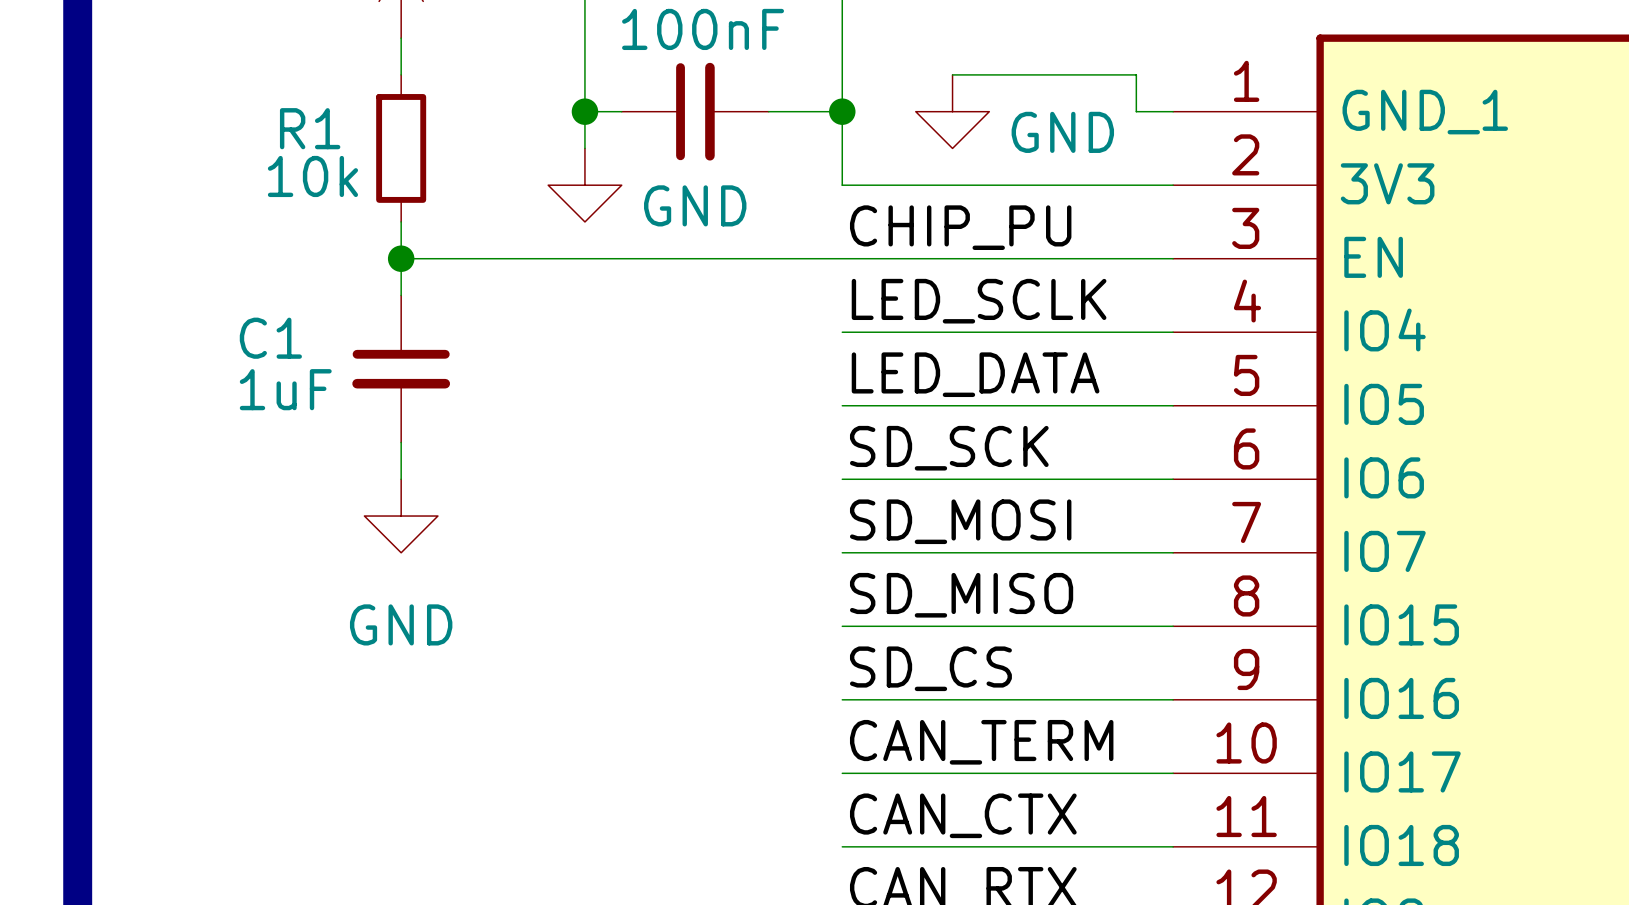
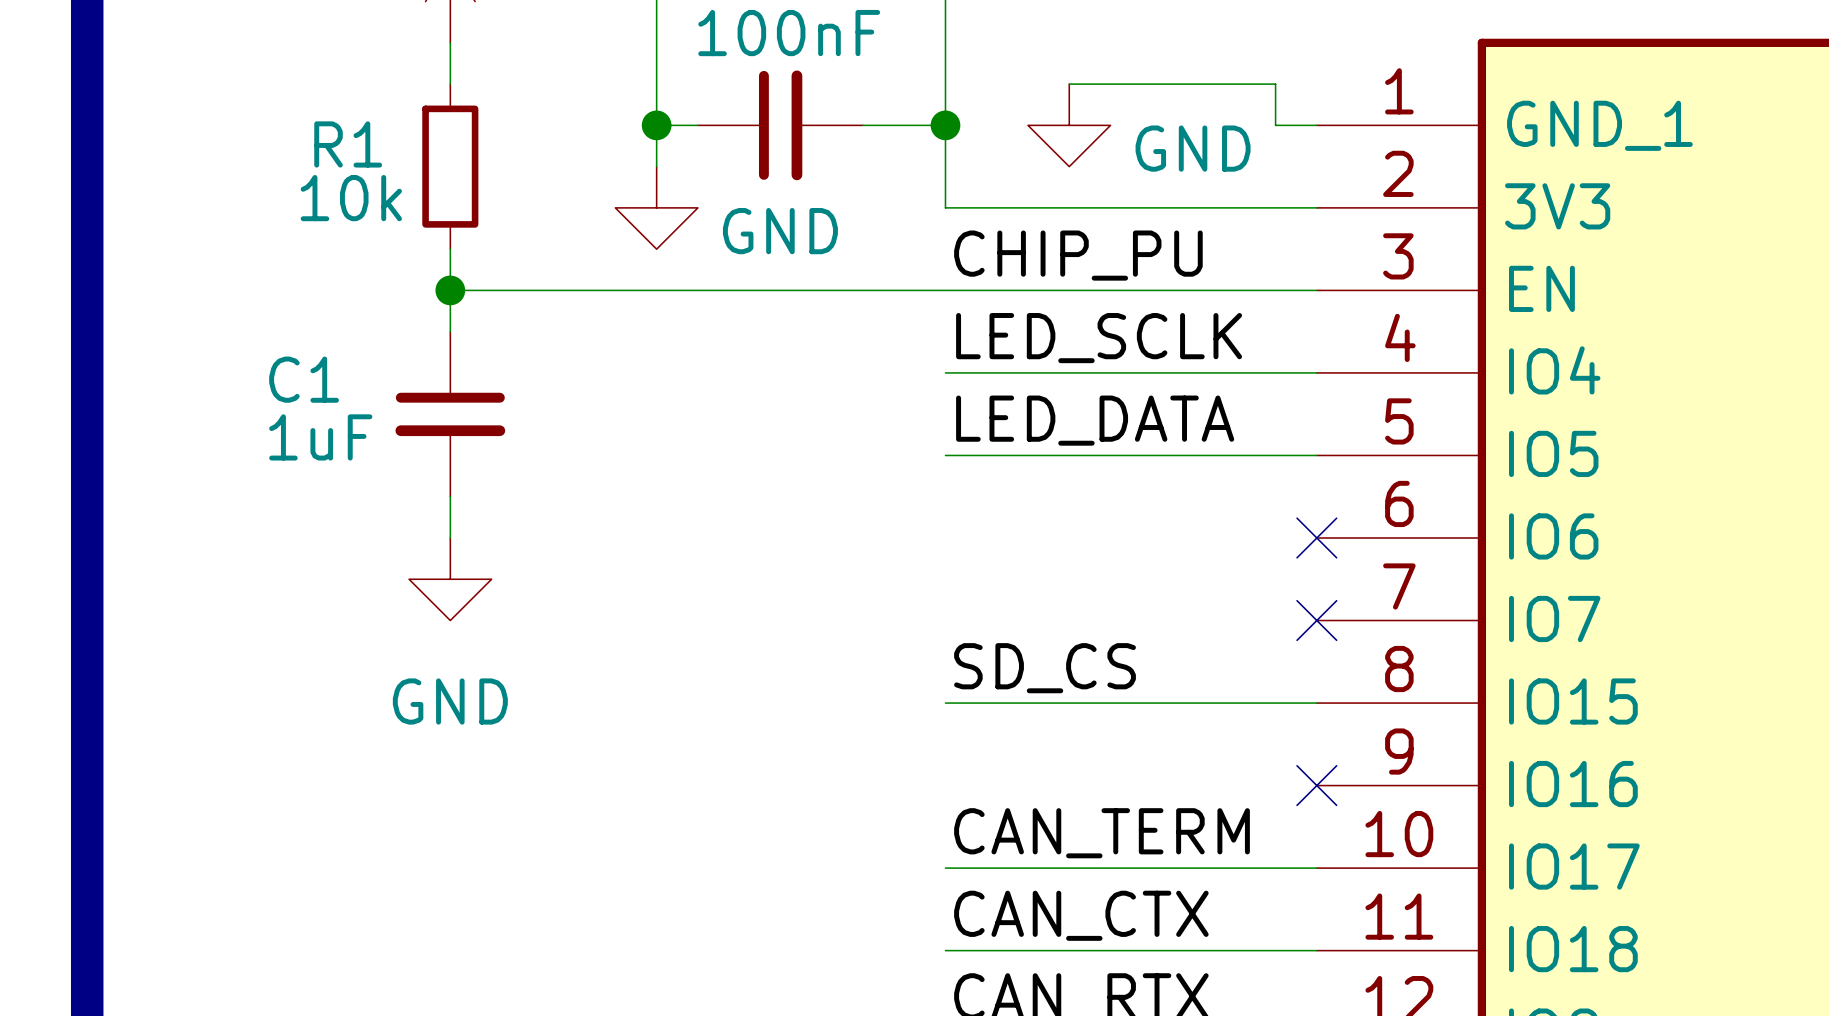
label: SD_SCK (949, 448) -> none
wire: (842, 479) (1173, 479) -> none
no-connect mark: none -> (1316, 537)
label: SD_MOSI (960, 521) -> none
wire: (842, 552) (1173, 552) -> none
no-connect mark: none -> (1316, 620)
label: SD_MISO (961, 595) -> SD_CS (1045, 668)
label: SD_CS (930, 668) -> none
wire: (842, 699) (1173, 699) -> none
no-connect mark: none -> (1316, 785)

